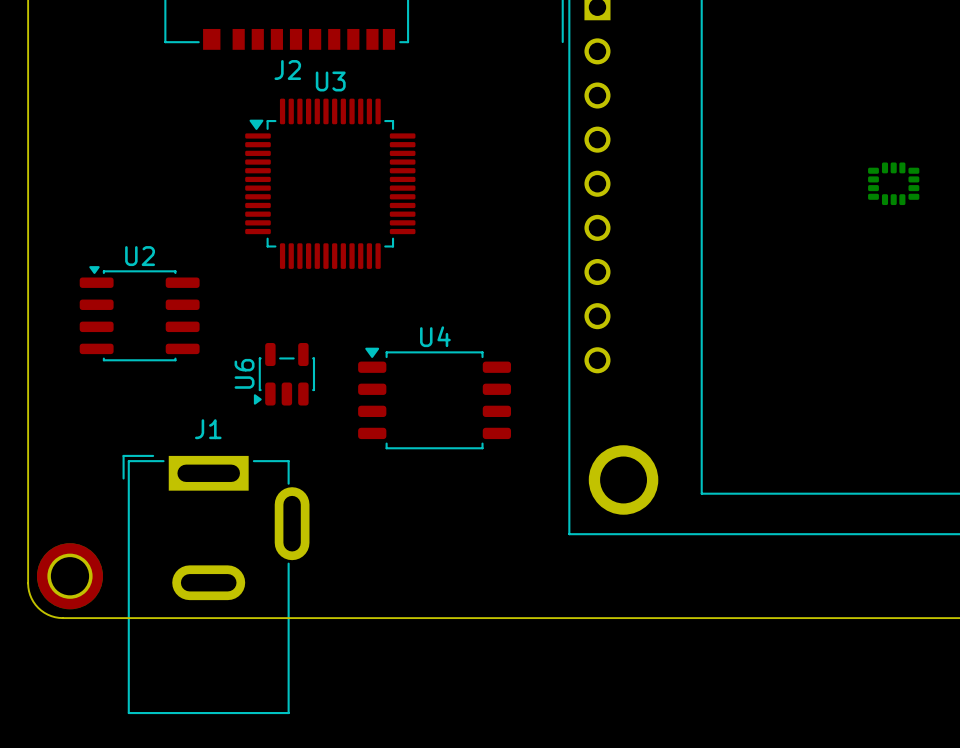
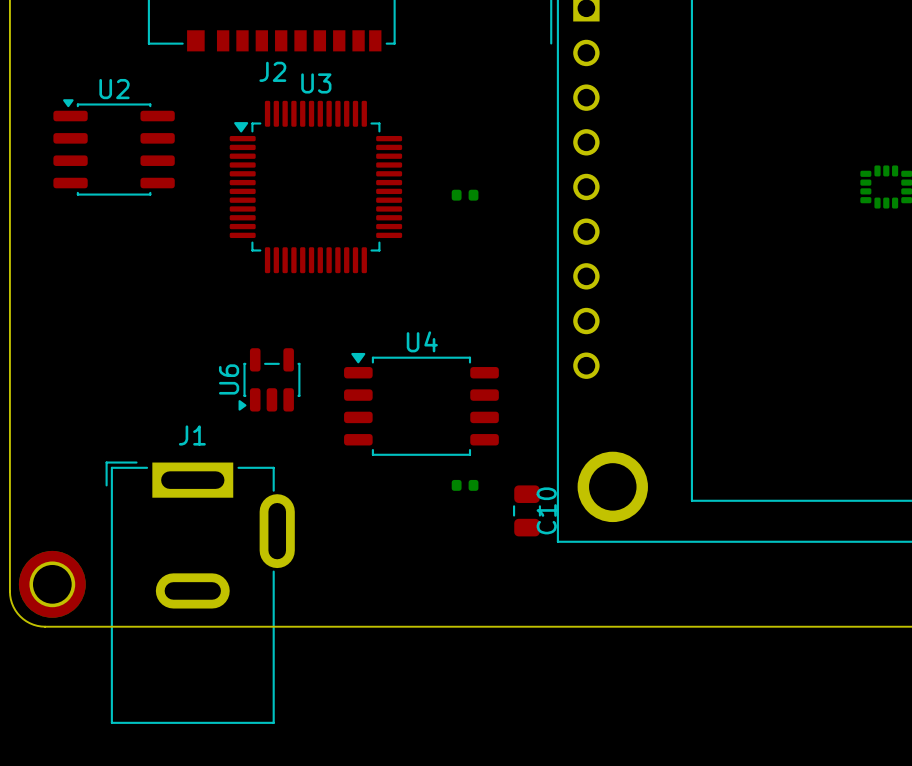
part: none -> (465, 195)
U2 position: (139, 313) -> (114, 147)
part: none -> (465, 485)
C10: none -> (526, 510)

